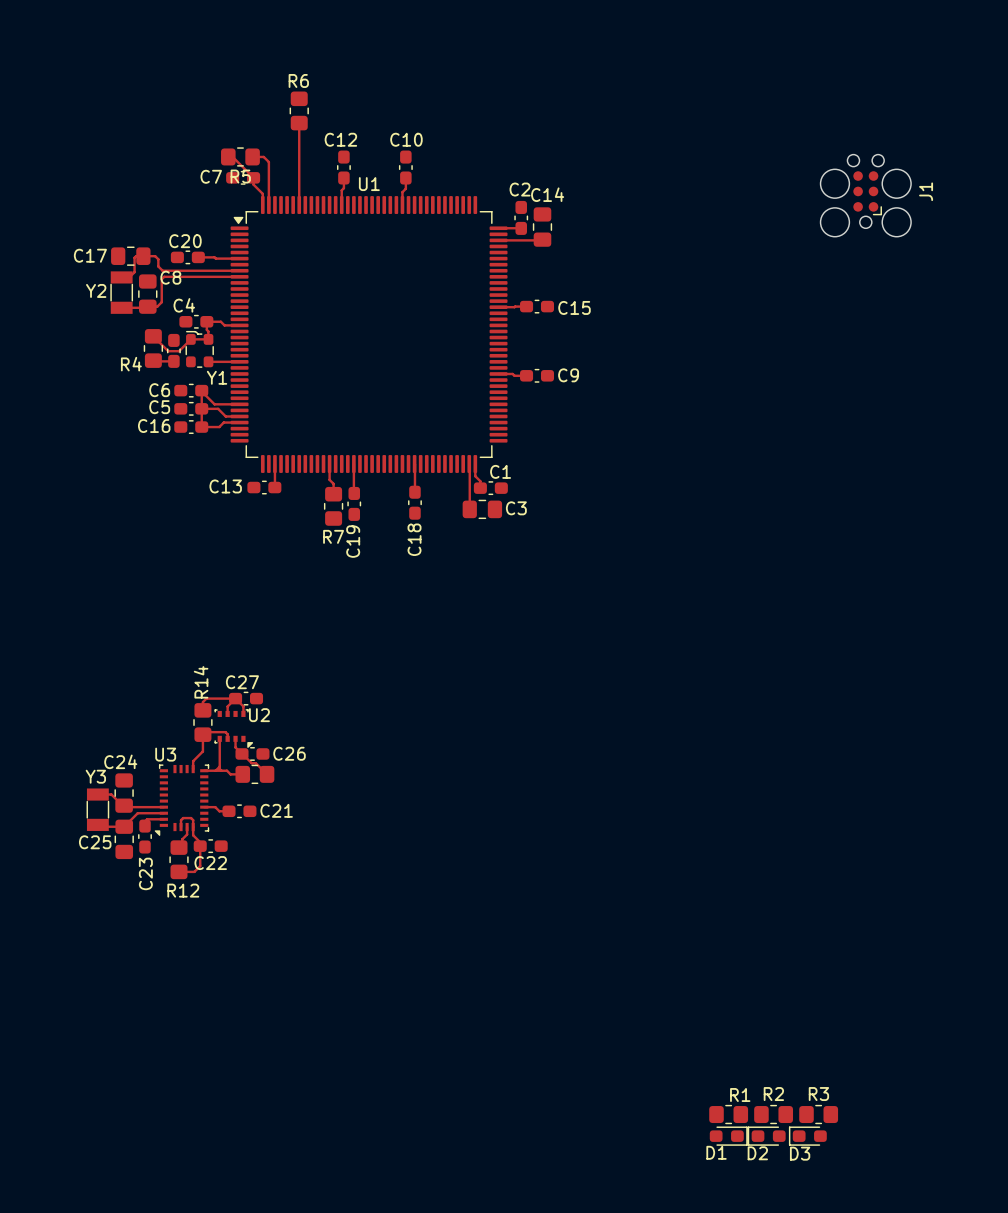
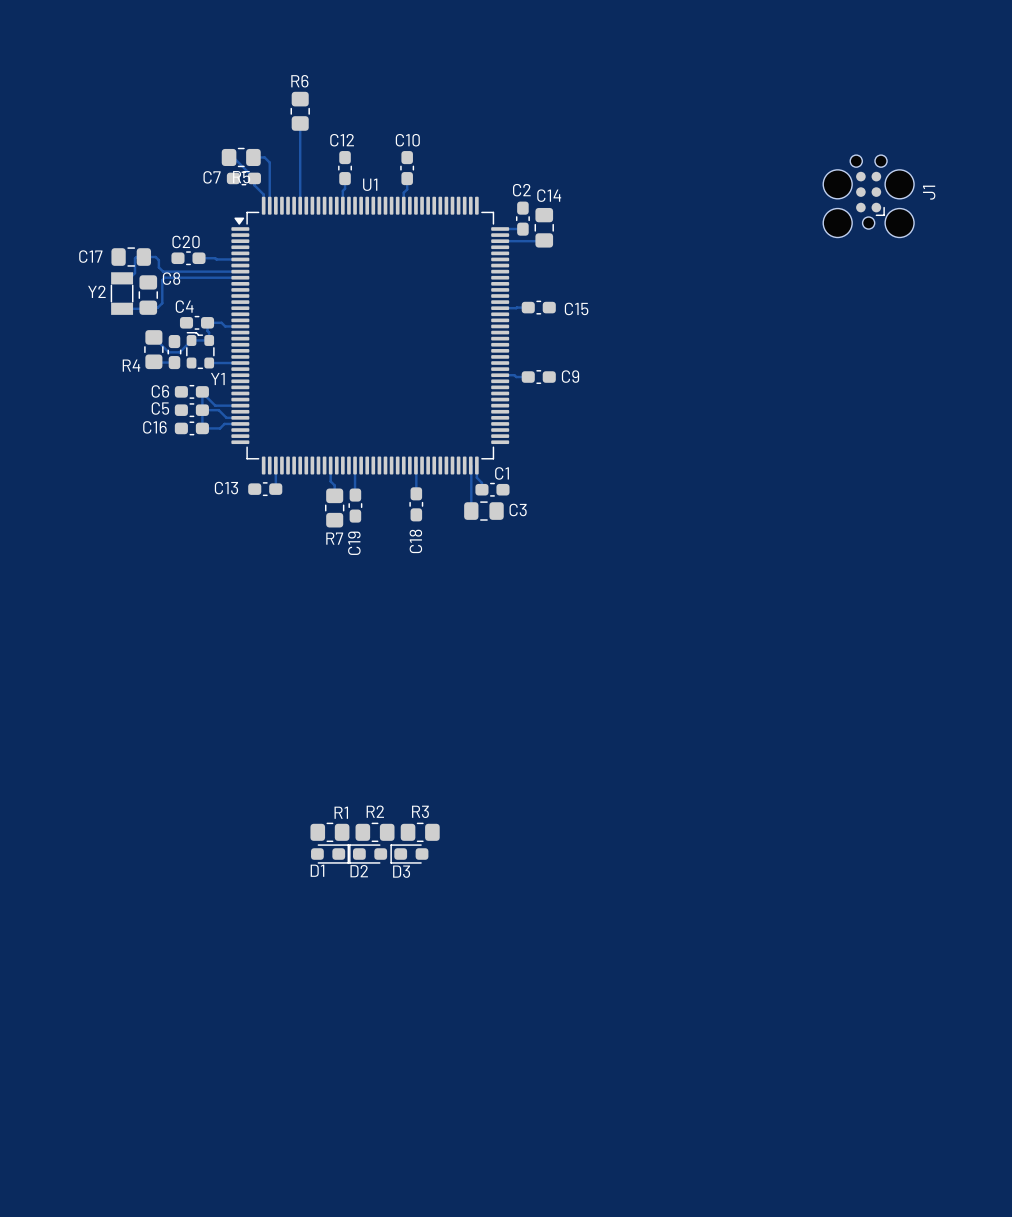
track: (235, 698) (243, 706) (243, 713) -> none
track: (235, 698) (227, 706) (227, 713) -> none
track: (235, 698) (206, 698) (202, 702) (202, 710) -> none
C27: (246, 698) -> none
R14: (202, 722) -> none
U2: (233, 728) -> none
track: (219, 738) (219, 769) (221, 770) -> none
track: (227, 738) (225, 732) (205, 732) (202, 734) (202, 751) (193, 761) (192, 768) -> none
track: (235, 738) (235, 747) (267, 774) -> none
C26: (252, 753) -> none
track: (219, 766) (215, 770) -> none
track: (204, 770) (226, 770) (230, 774) (242, 774) -> none
part: (254, 774) -> none
C24: (124, 793) -> none
track: (97, 794) (111, 794) (125, 807) (163, 807) -> none
U3: (181, 800) -> none
track: (204, 807) (215, 807) (219, 811) (229, 811) -> none
Y3: (97, 809) -> none
C21: (239, 811) -> none
track: (163, 813) (137, 813) (124, 826) (99, 826) (97, 824) -> none
track: (163, 819) (147, 819) (145, 826) -> none
track: (181, 827) (181, 820) (183, 818) (191, 818) (193, 820) (193, 835) (200, 842) (200, 866) (194, 871) (179, 871) -> none
track: (187, 827) (187, 834) (182, 839) (182, 844) (179, 847) -> none
C23: (145, 836) -> none
C25: (124, 839) -> none
C22: (210, 846) -> none
R12: (179, 859) -> none
R1 position: (728, 1114) -> (329, 832)
R2 position: (773, 1114) -> (375, 832)
R3 position: (818, 1114) -> (420, 832)
D1 position: (728, 1136) -> (330, 854)
D2 position: (766, 1136) -> (368, 854)
D3 position: (807, 1136) -> (409, 854)

